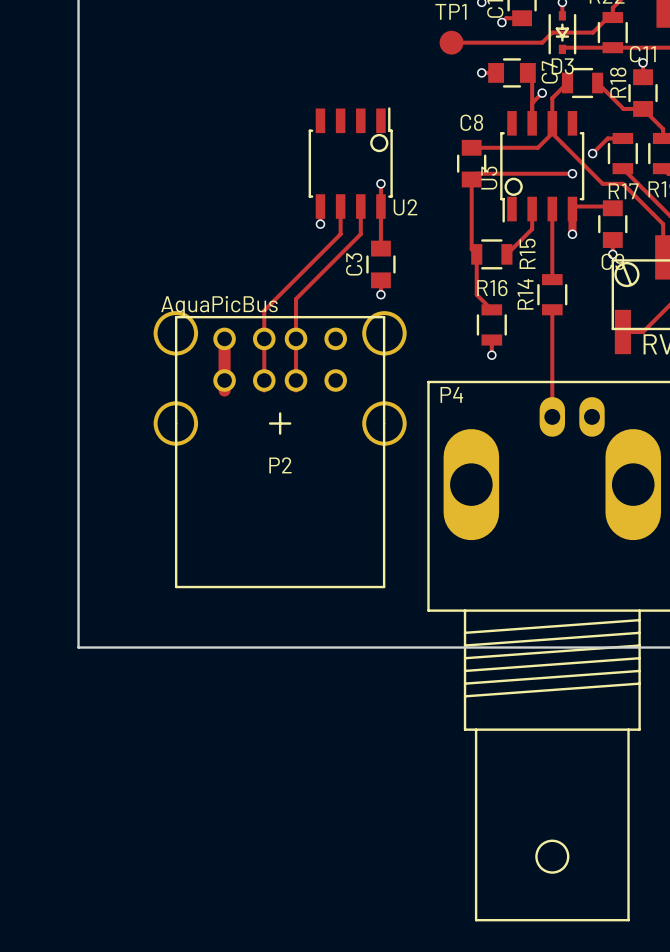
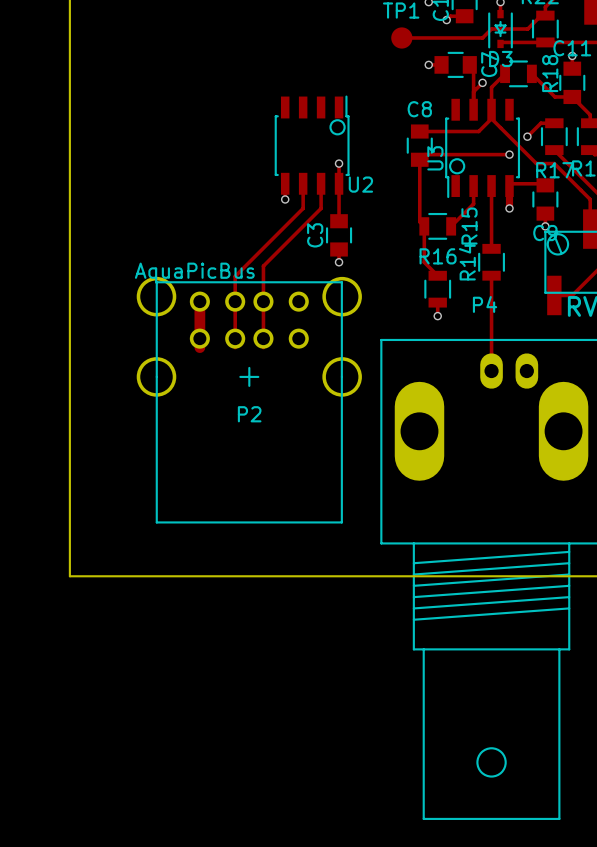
P4 name position: P4 (451, 394) -> P4 (485, 304)

